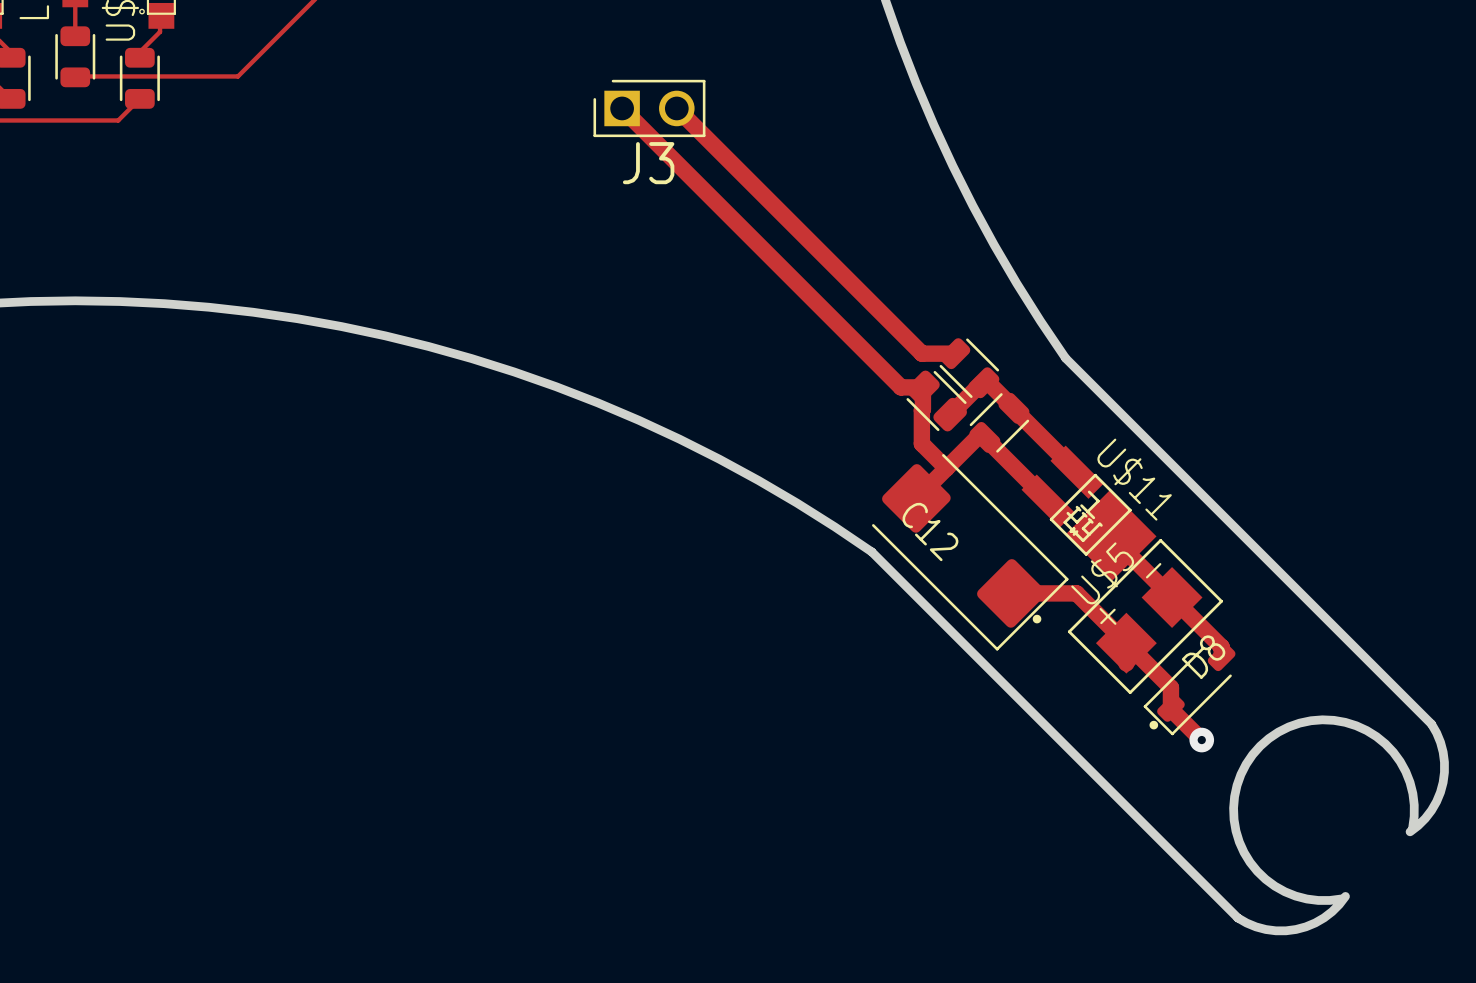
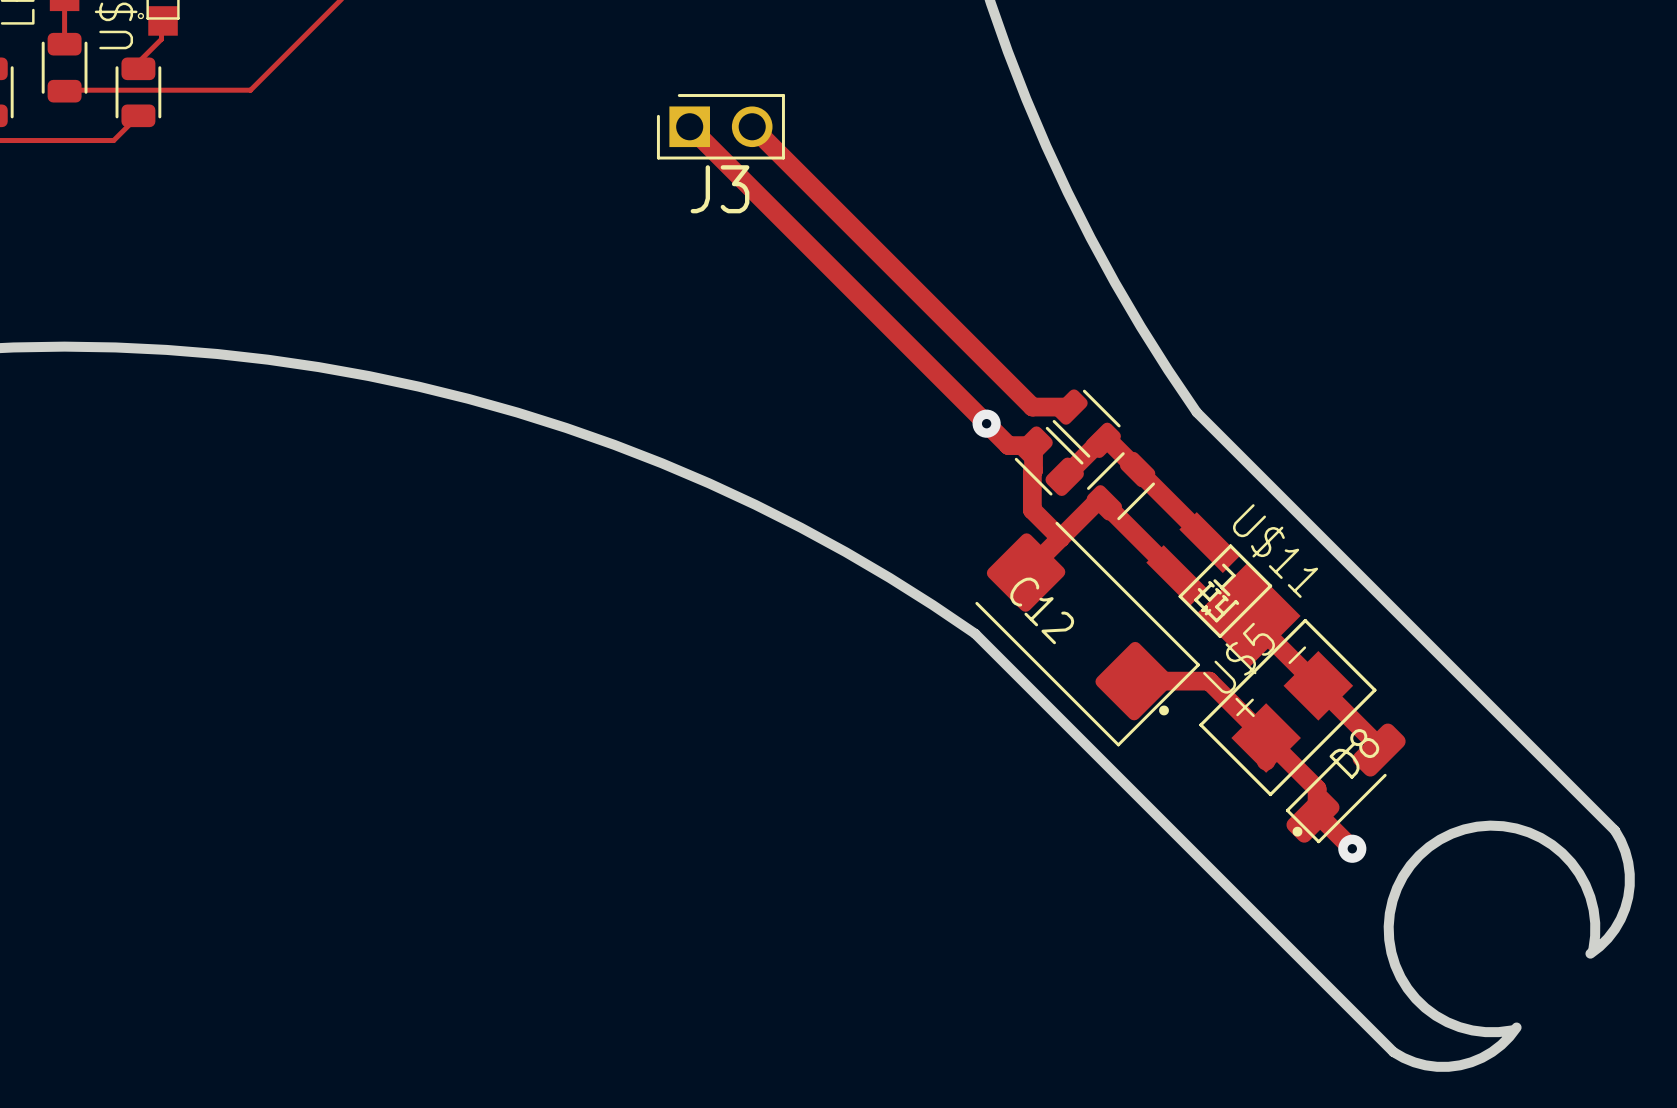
via: none -> (986, 423)
D8 footprint: [1143, 643, 1236, 736] -> [1285, 723, 1406, 844]

